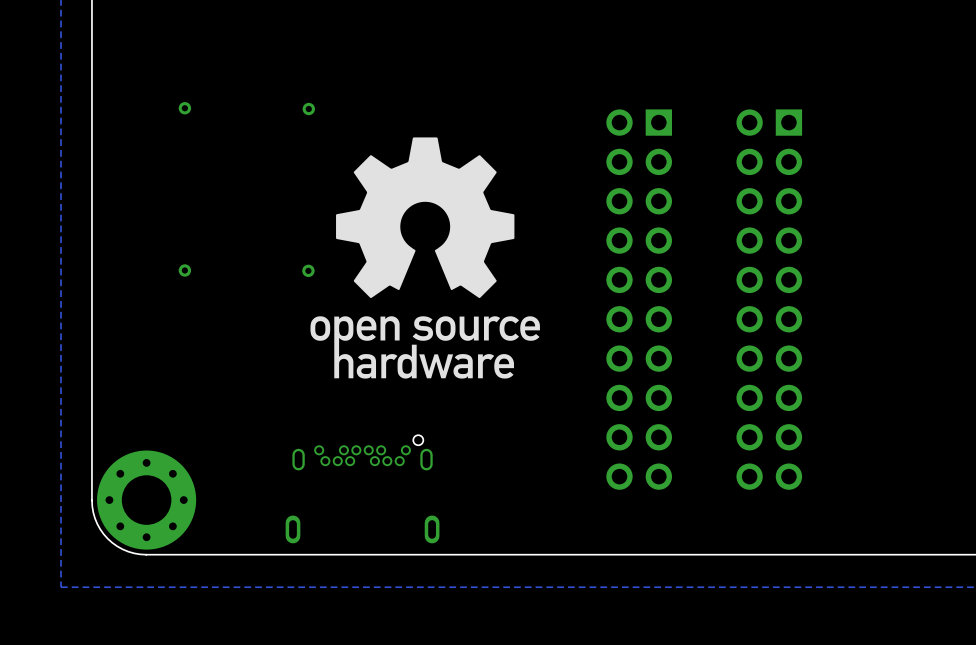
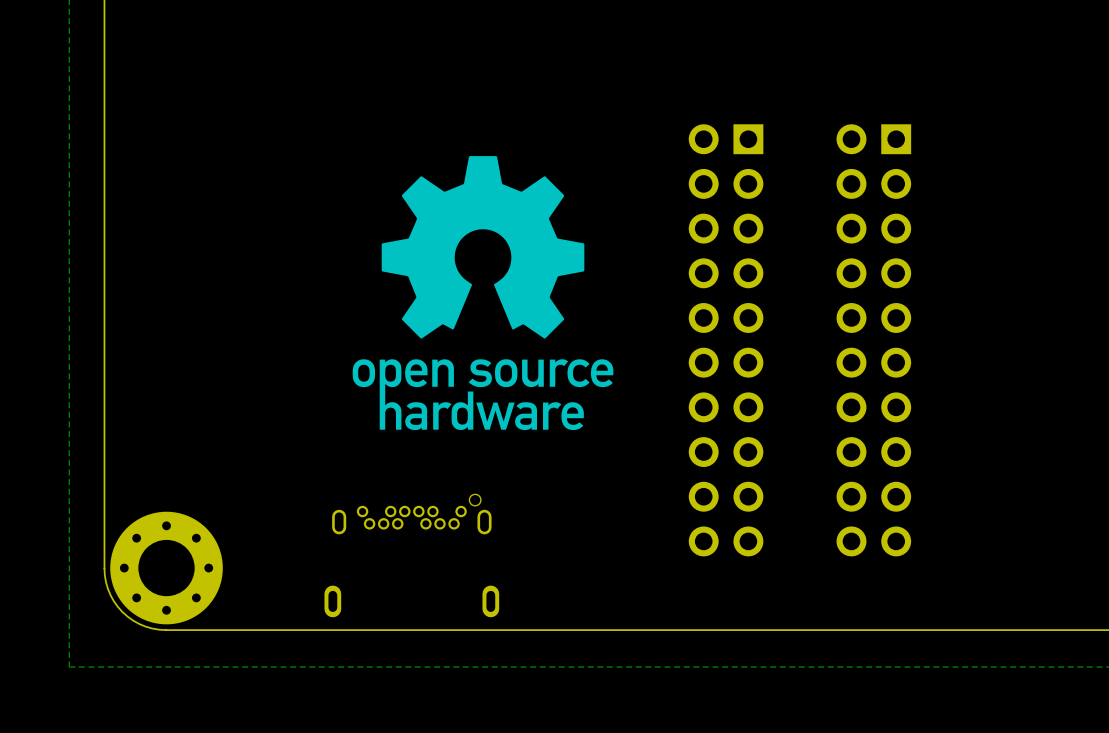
via: (184, 108) -> none
via: (308, 109) -> none
via: (184, 270) -> none
via: (308, 270) -> none

